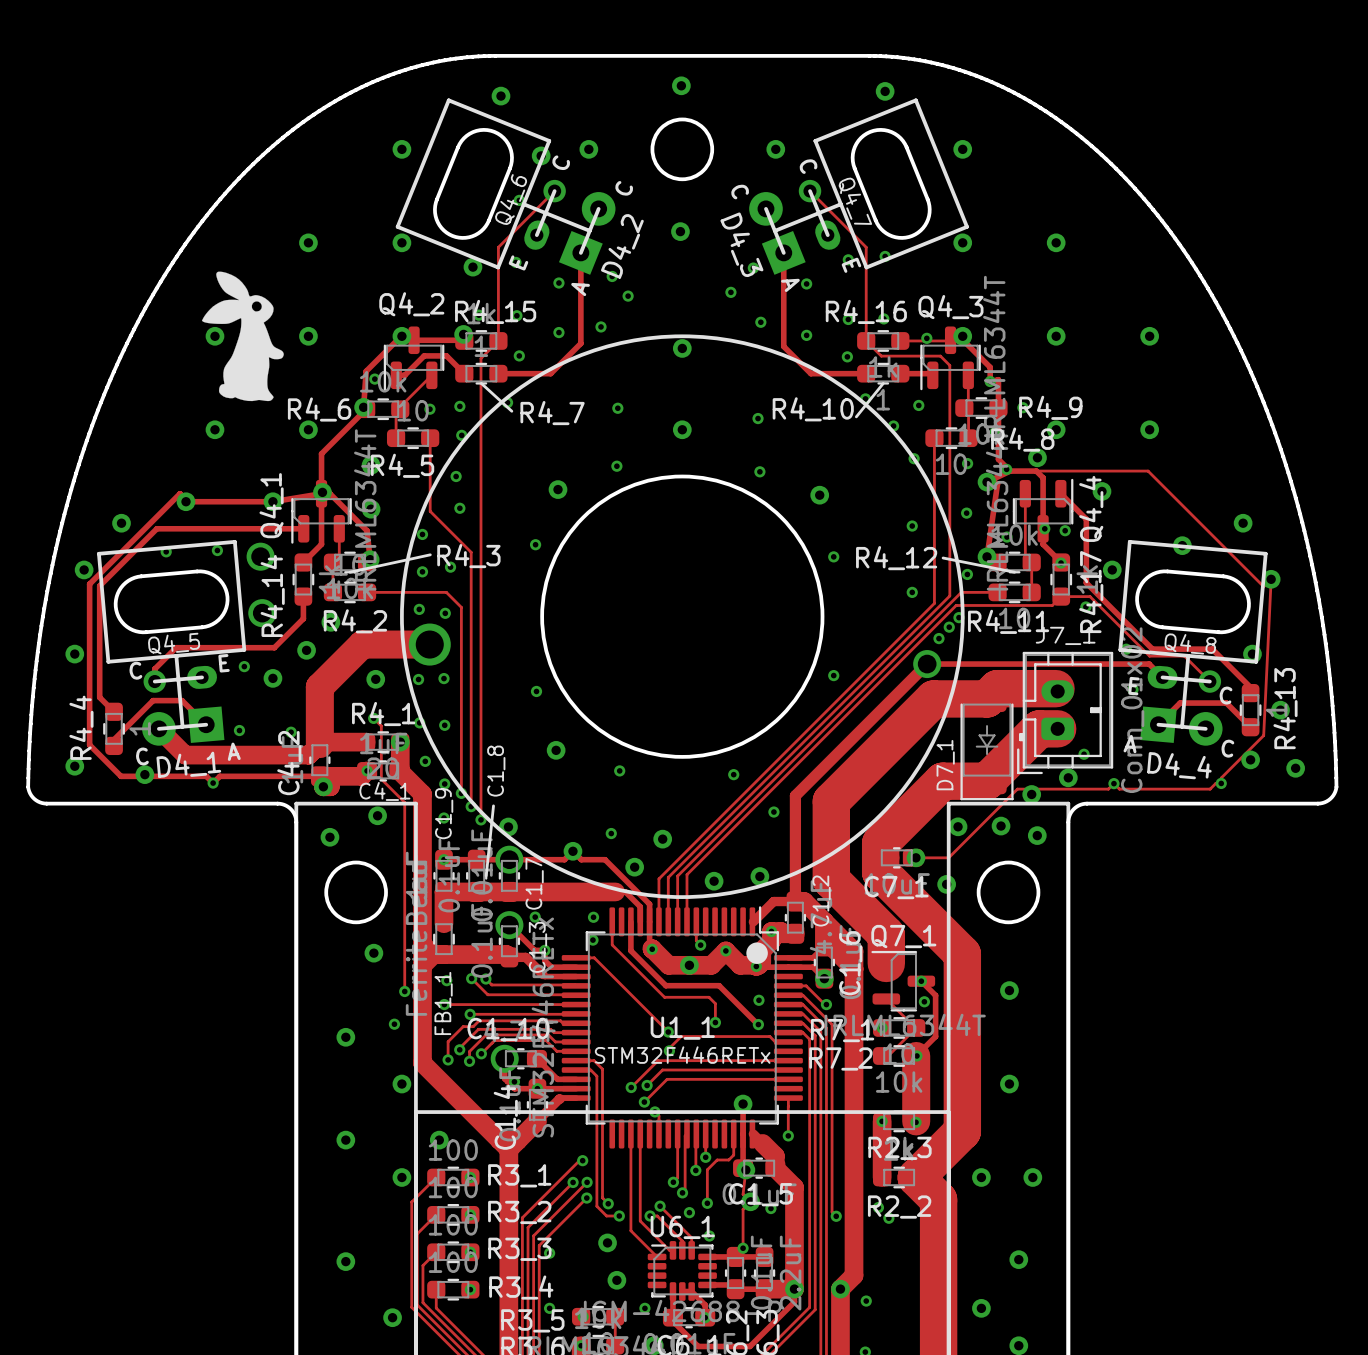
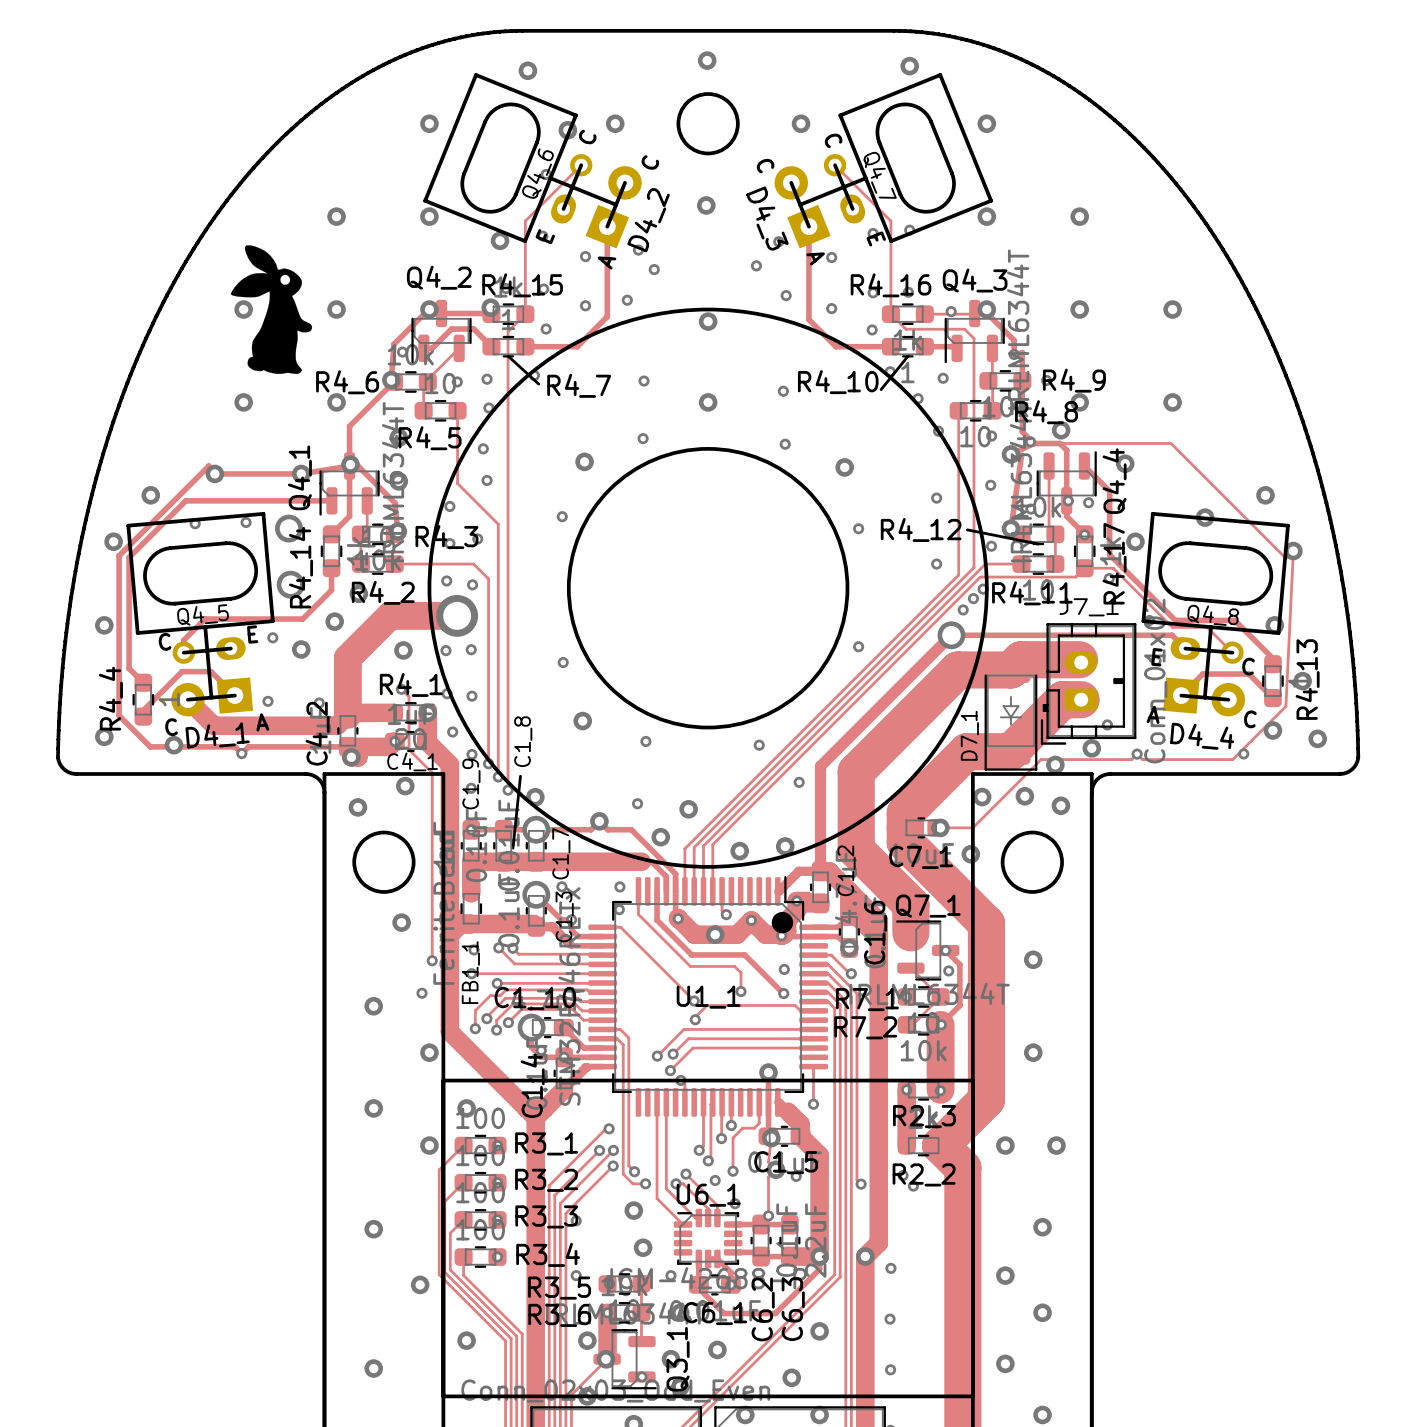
line: (430, 554) (350, 572) -> none
R4_3 name position: R4_3 (468, 556) -> R4_3 (446, 537)
text: STM32F446RETx (682, 1055) -> none

